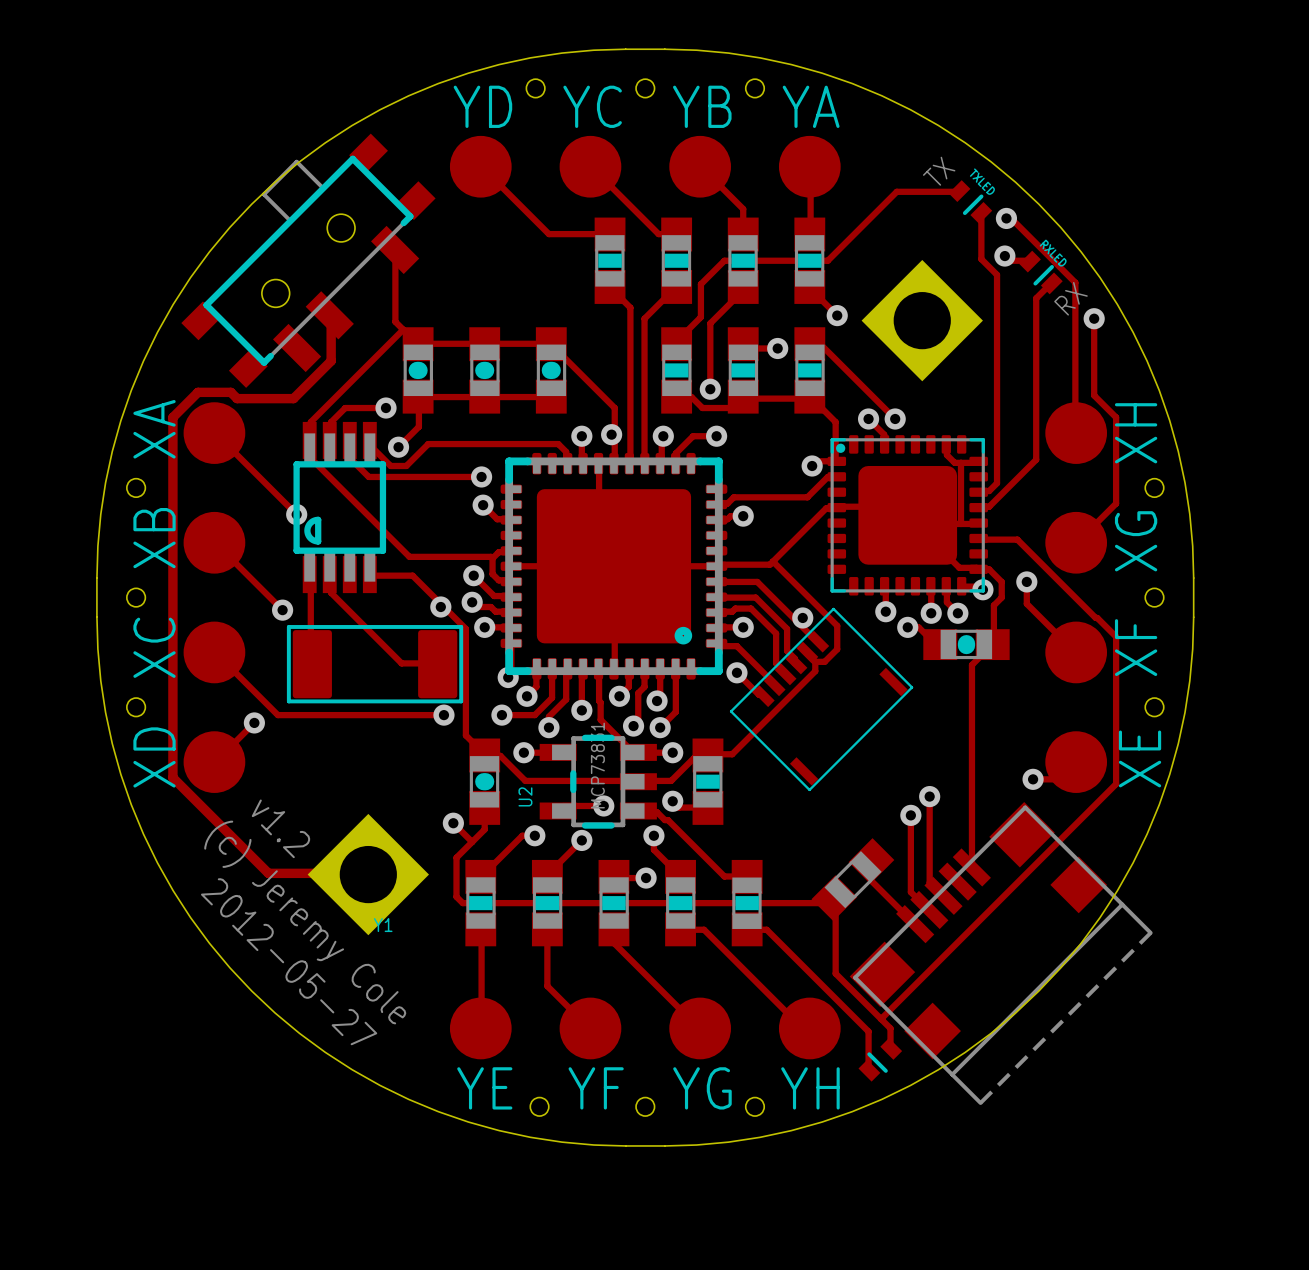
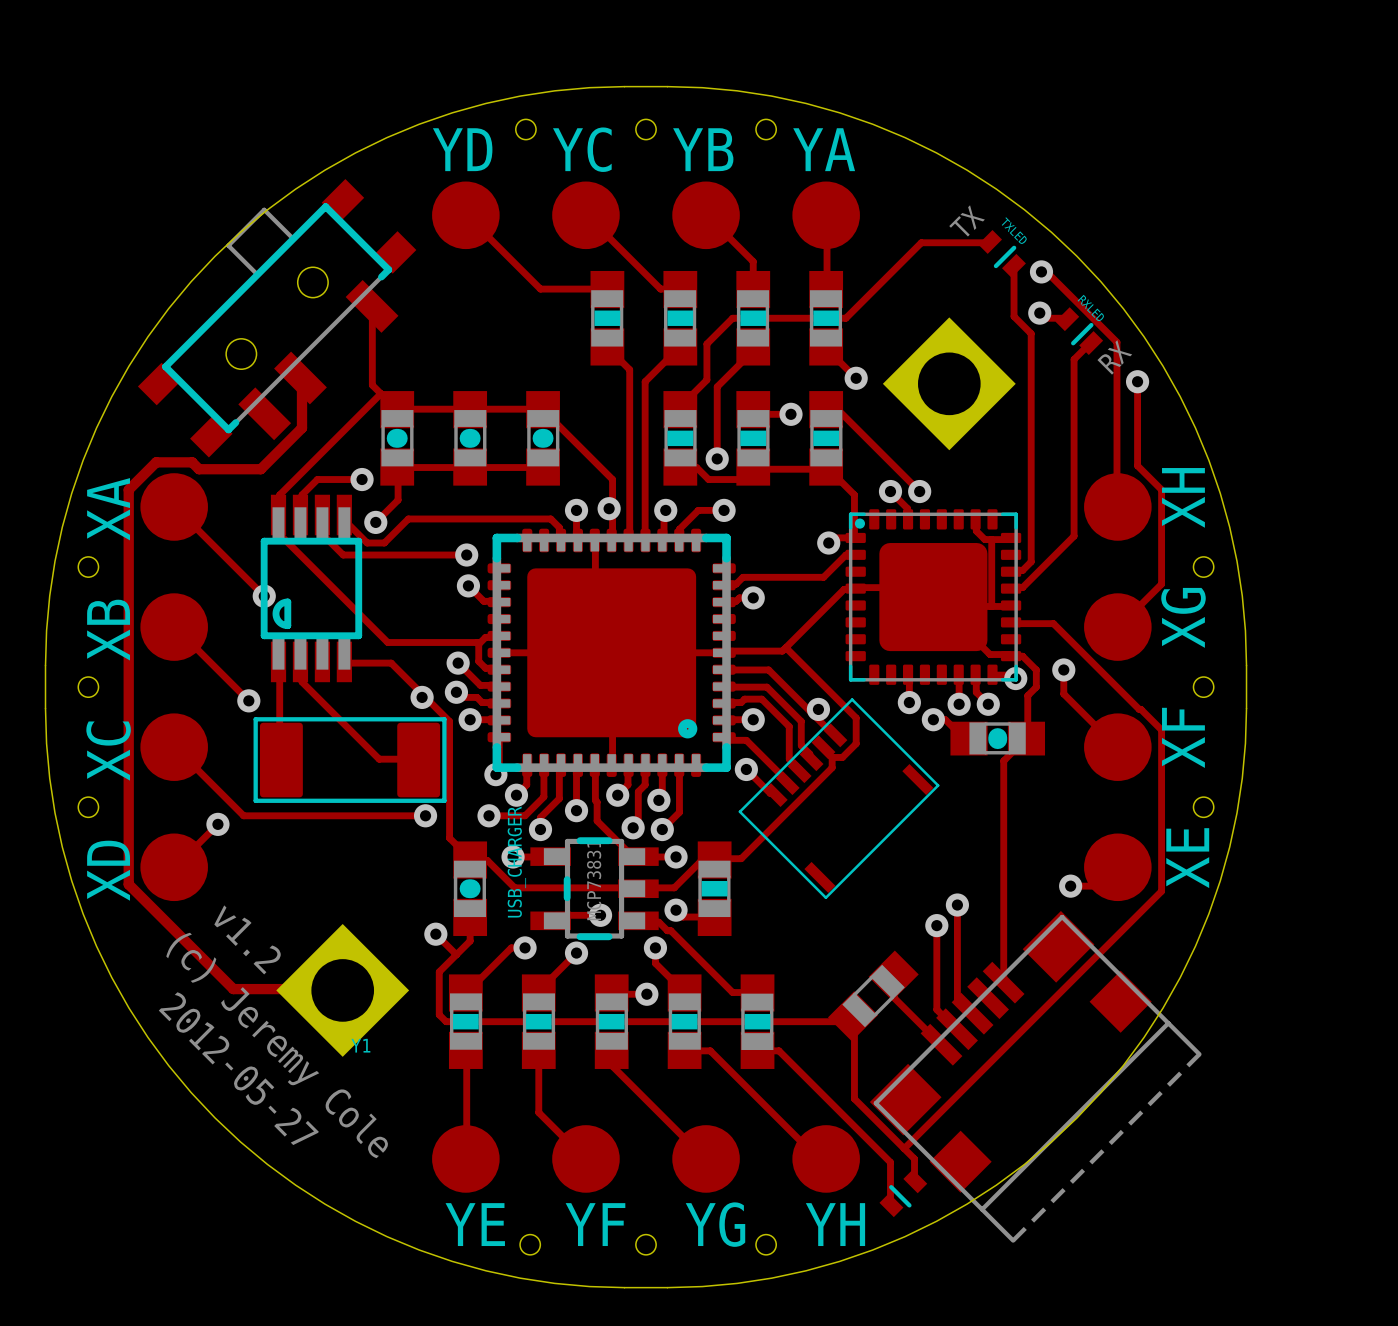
U2 name: U2 (525, 796) -> USB_CHARGER (516, 862)

